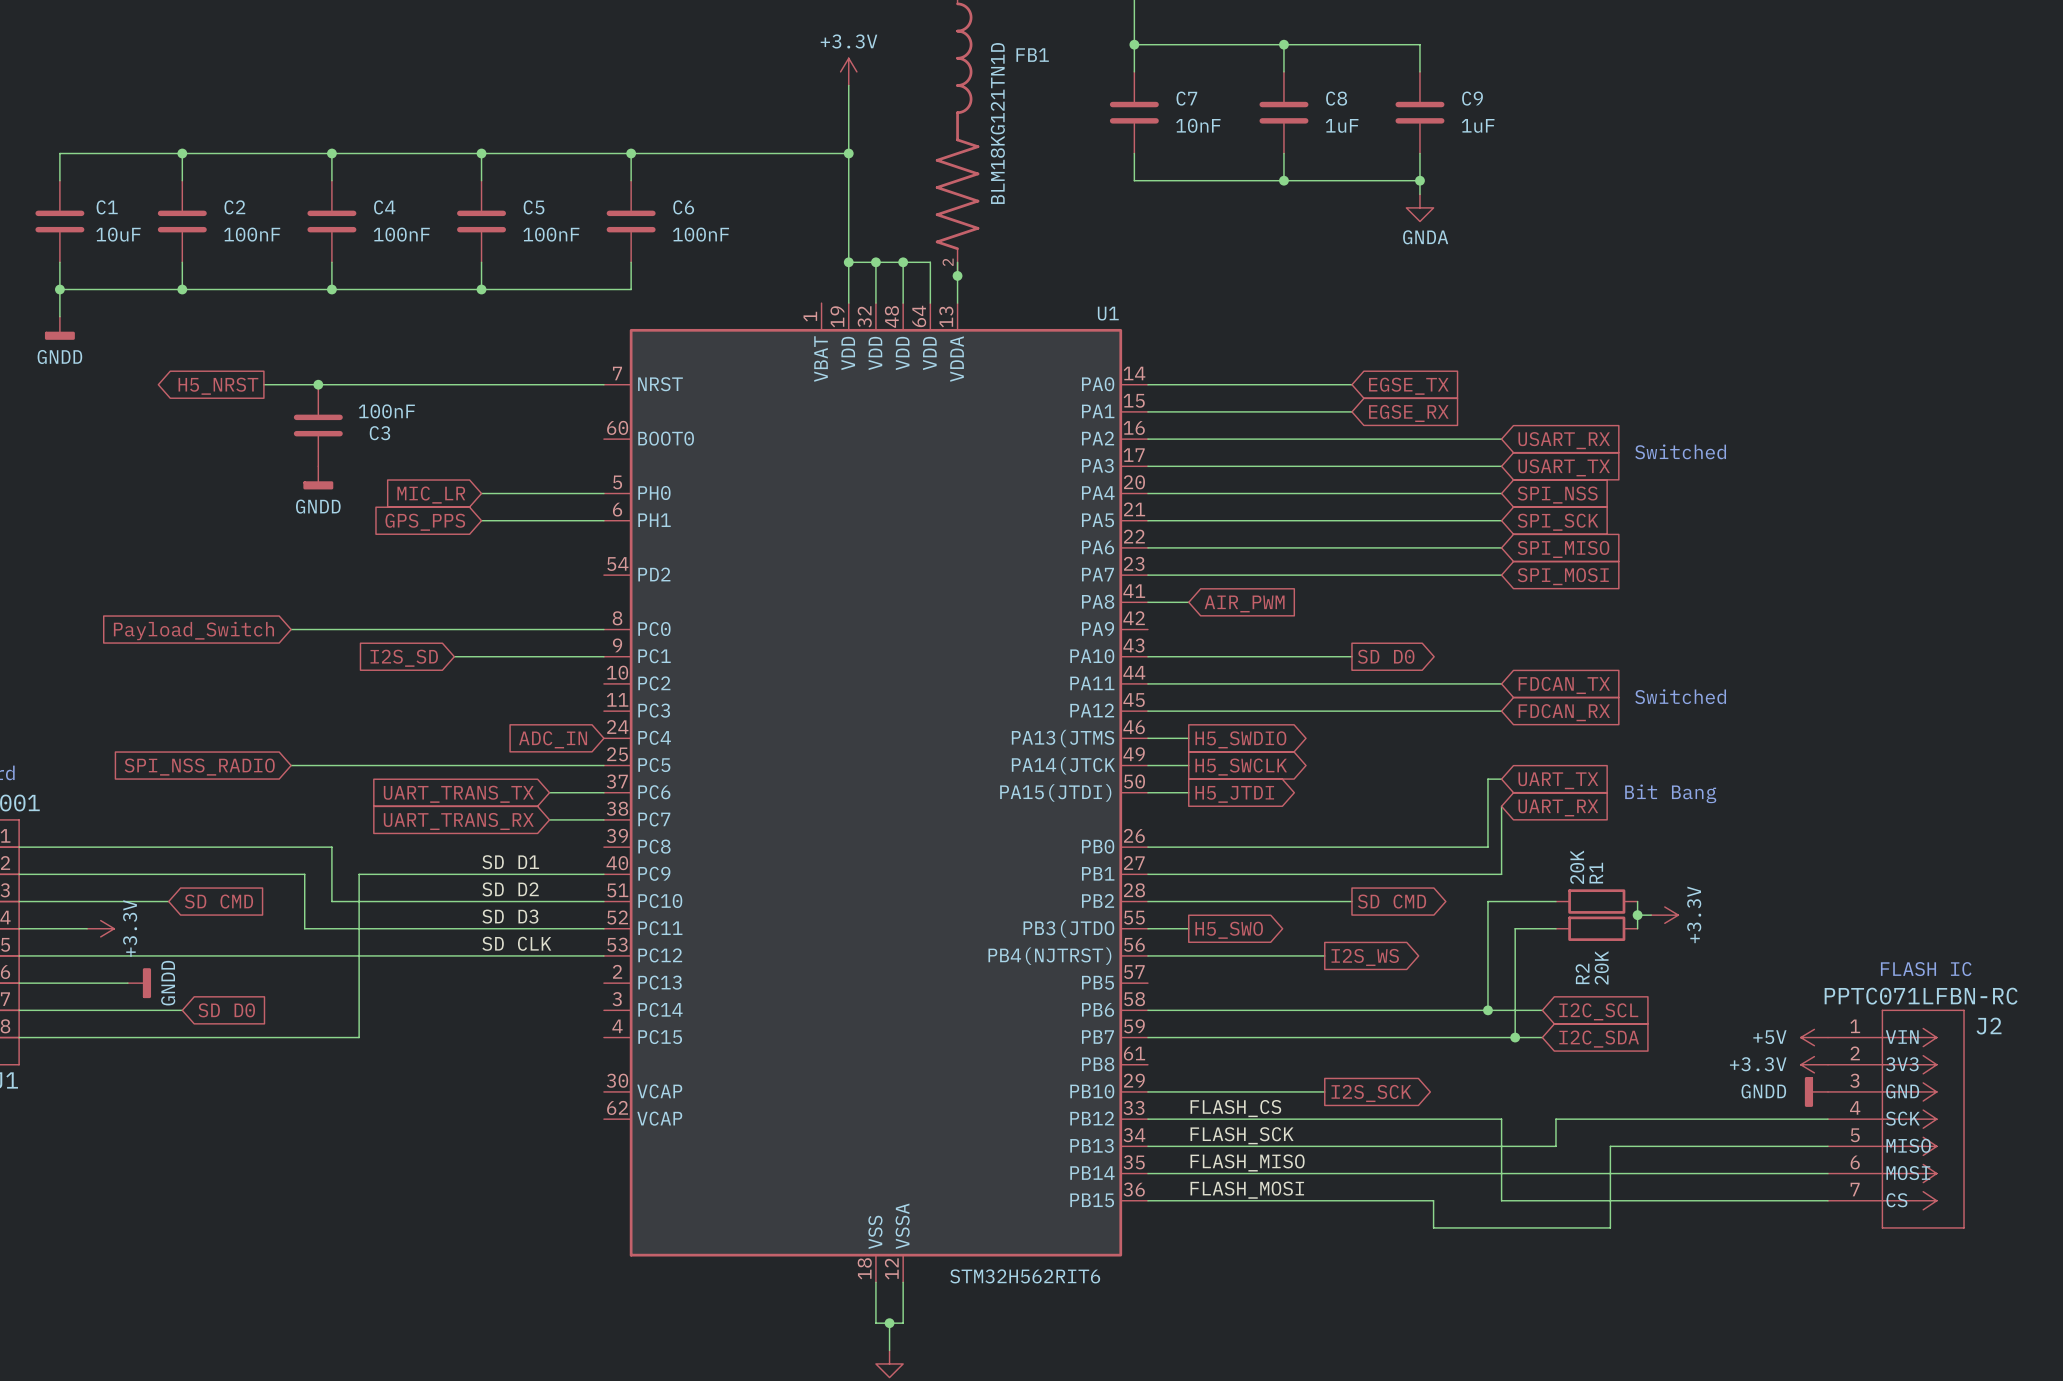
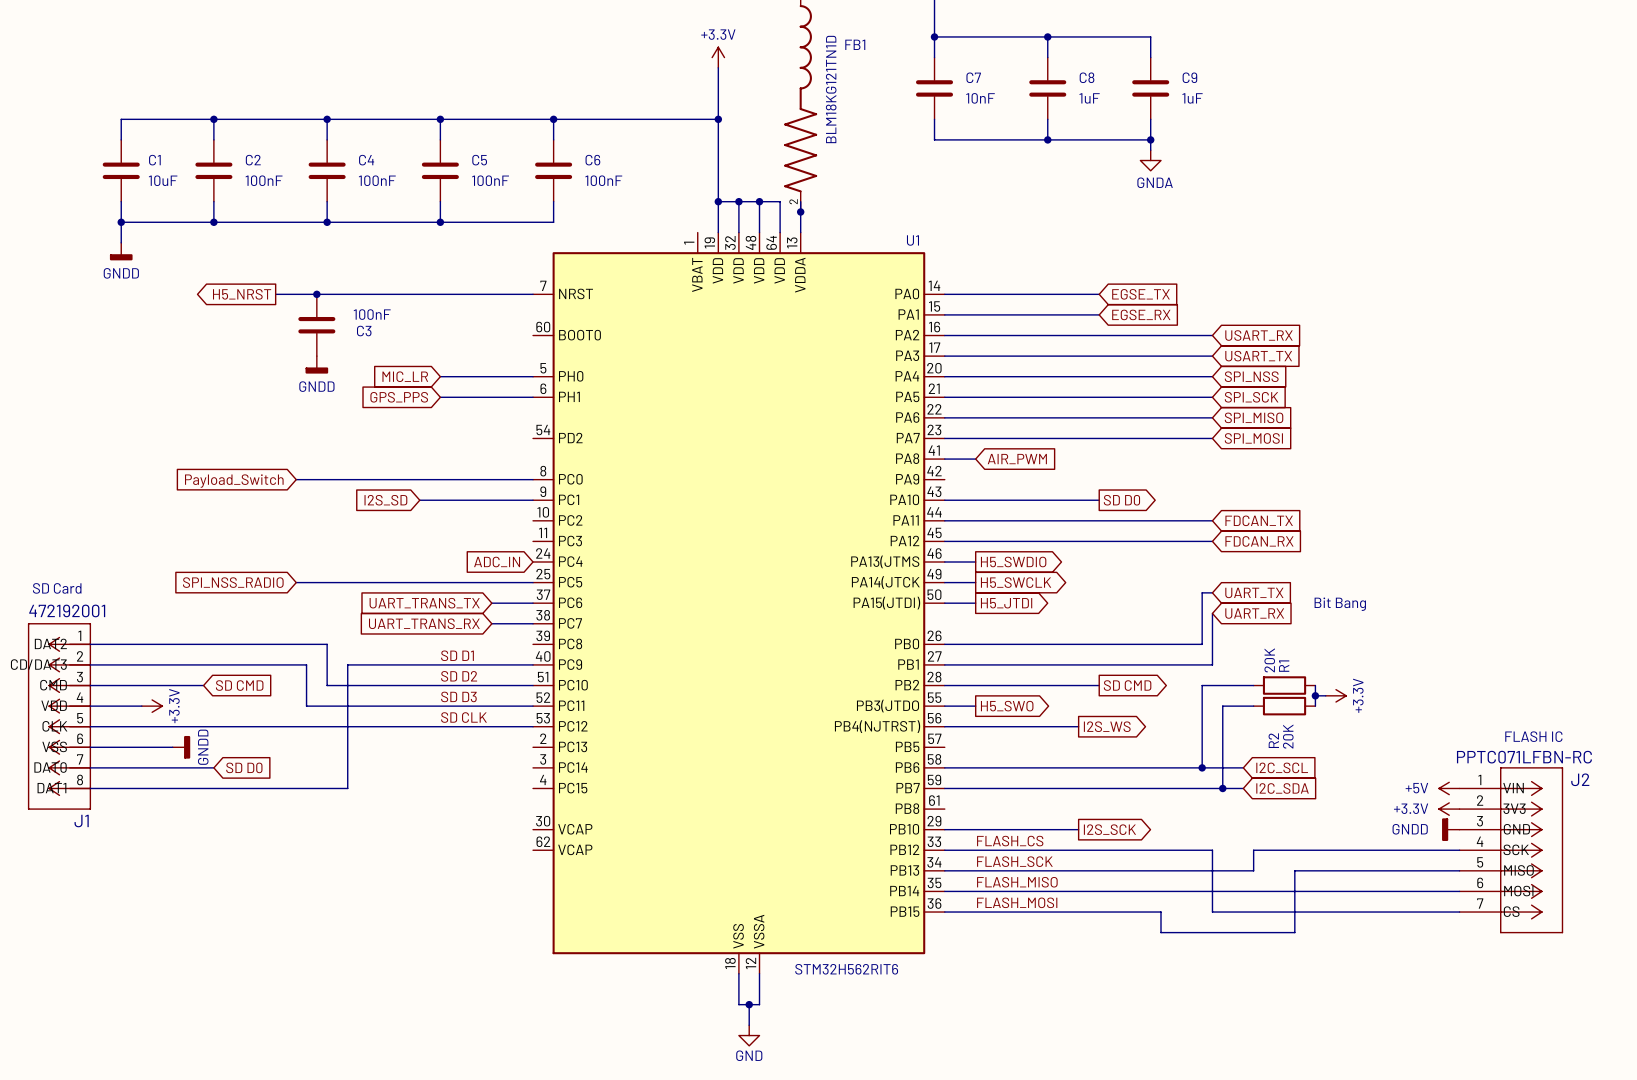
text: Switched (1680, 451) -> none
text: Switched (1680, 696) -> none

